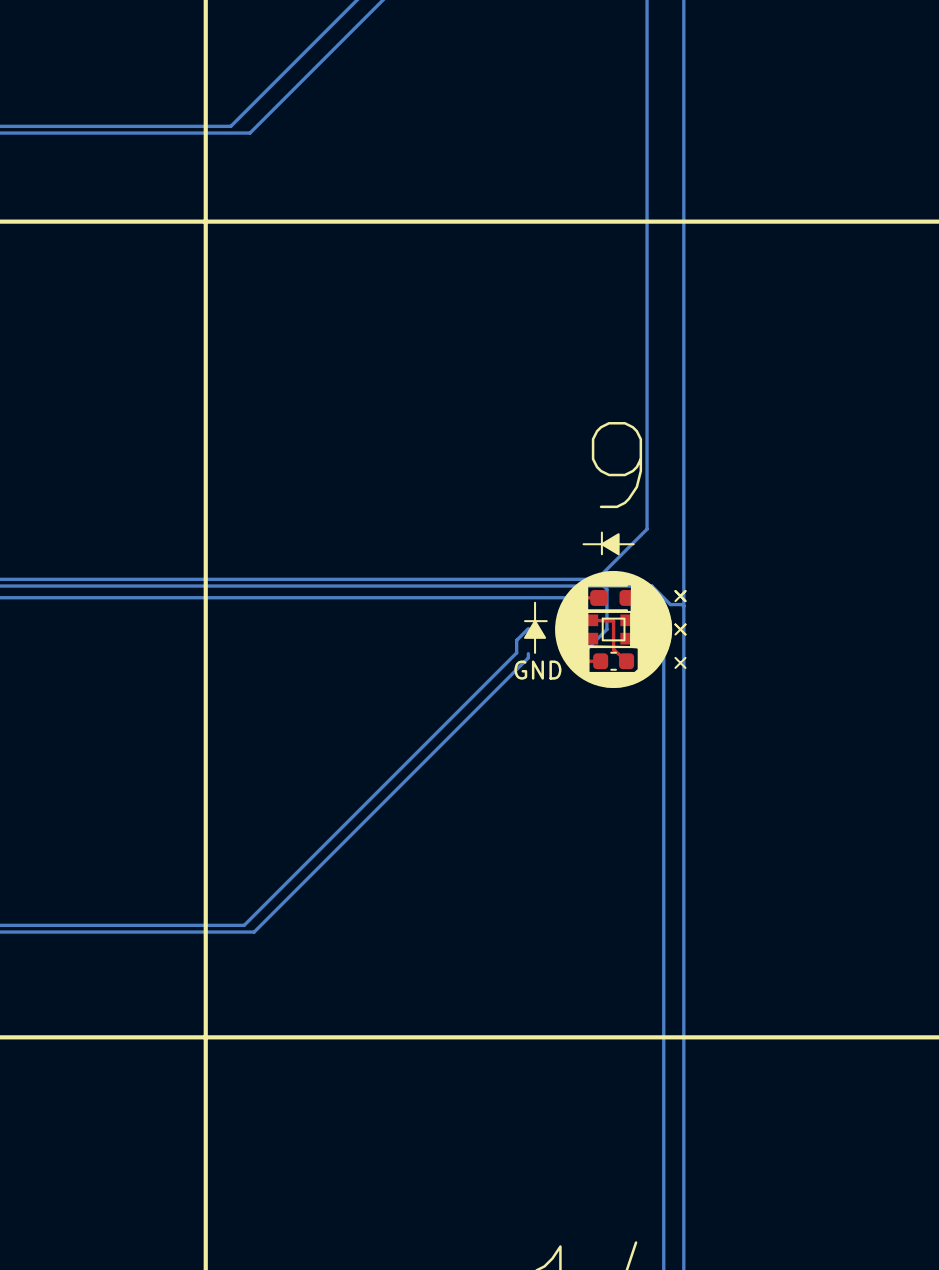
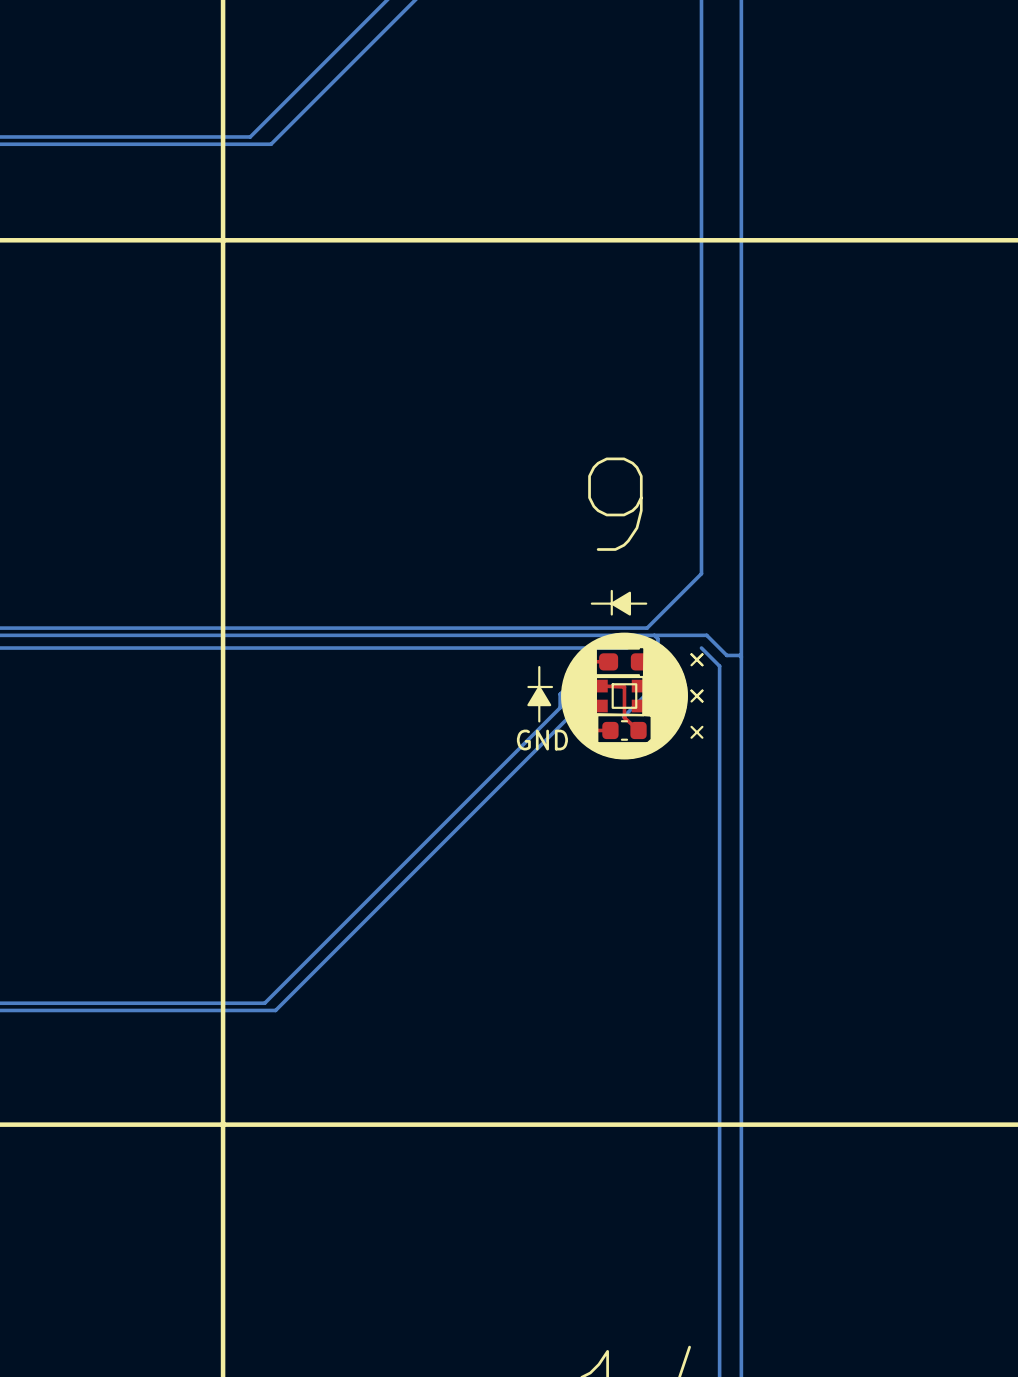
text position: 9 (616, 465) -> 9 (615, 504)
part position: (605, 609) -> (615, 674)

